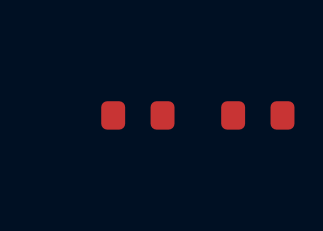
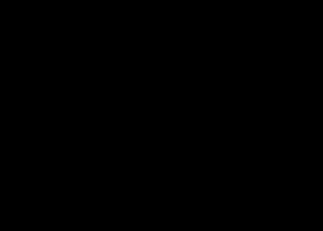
part: (137, 115) -> none
part: (257, 115) -> none

